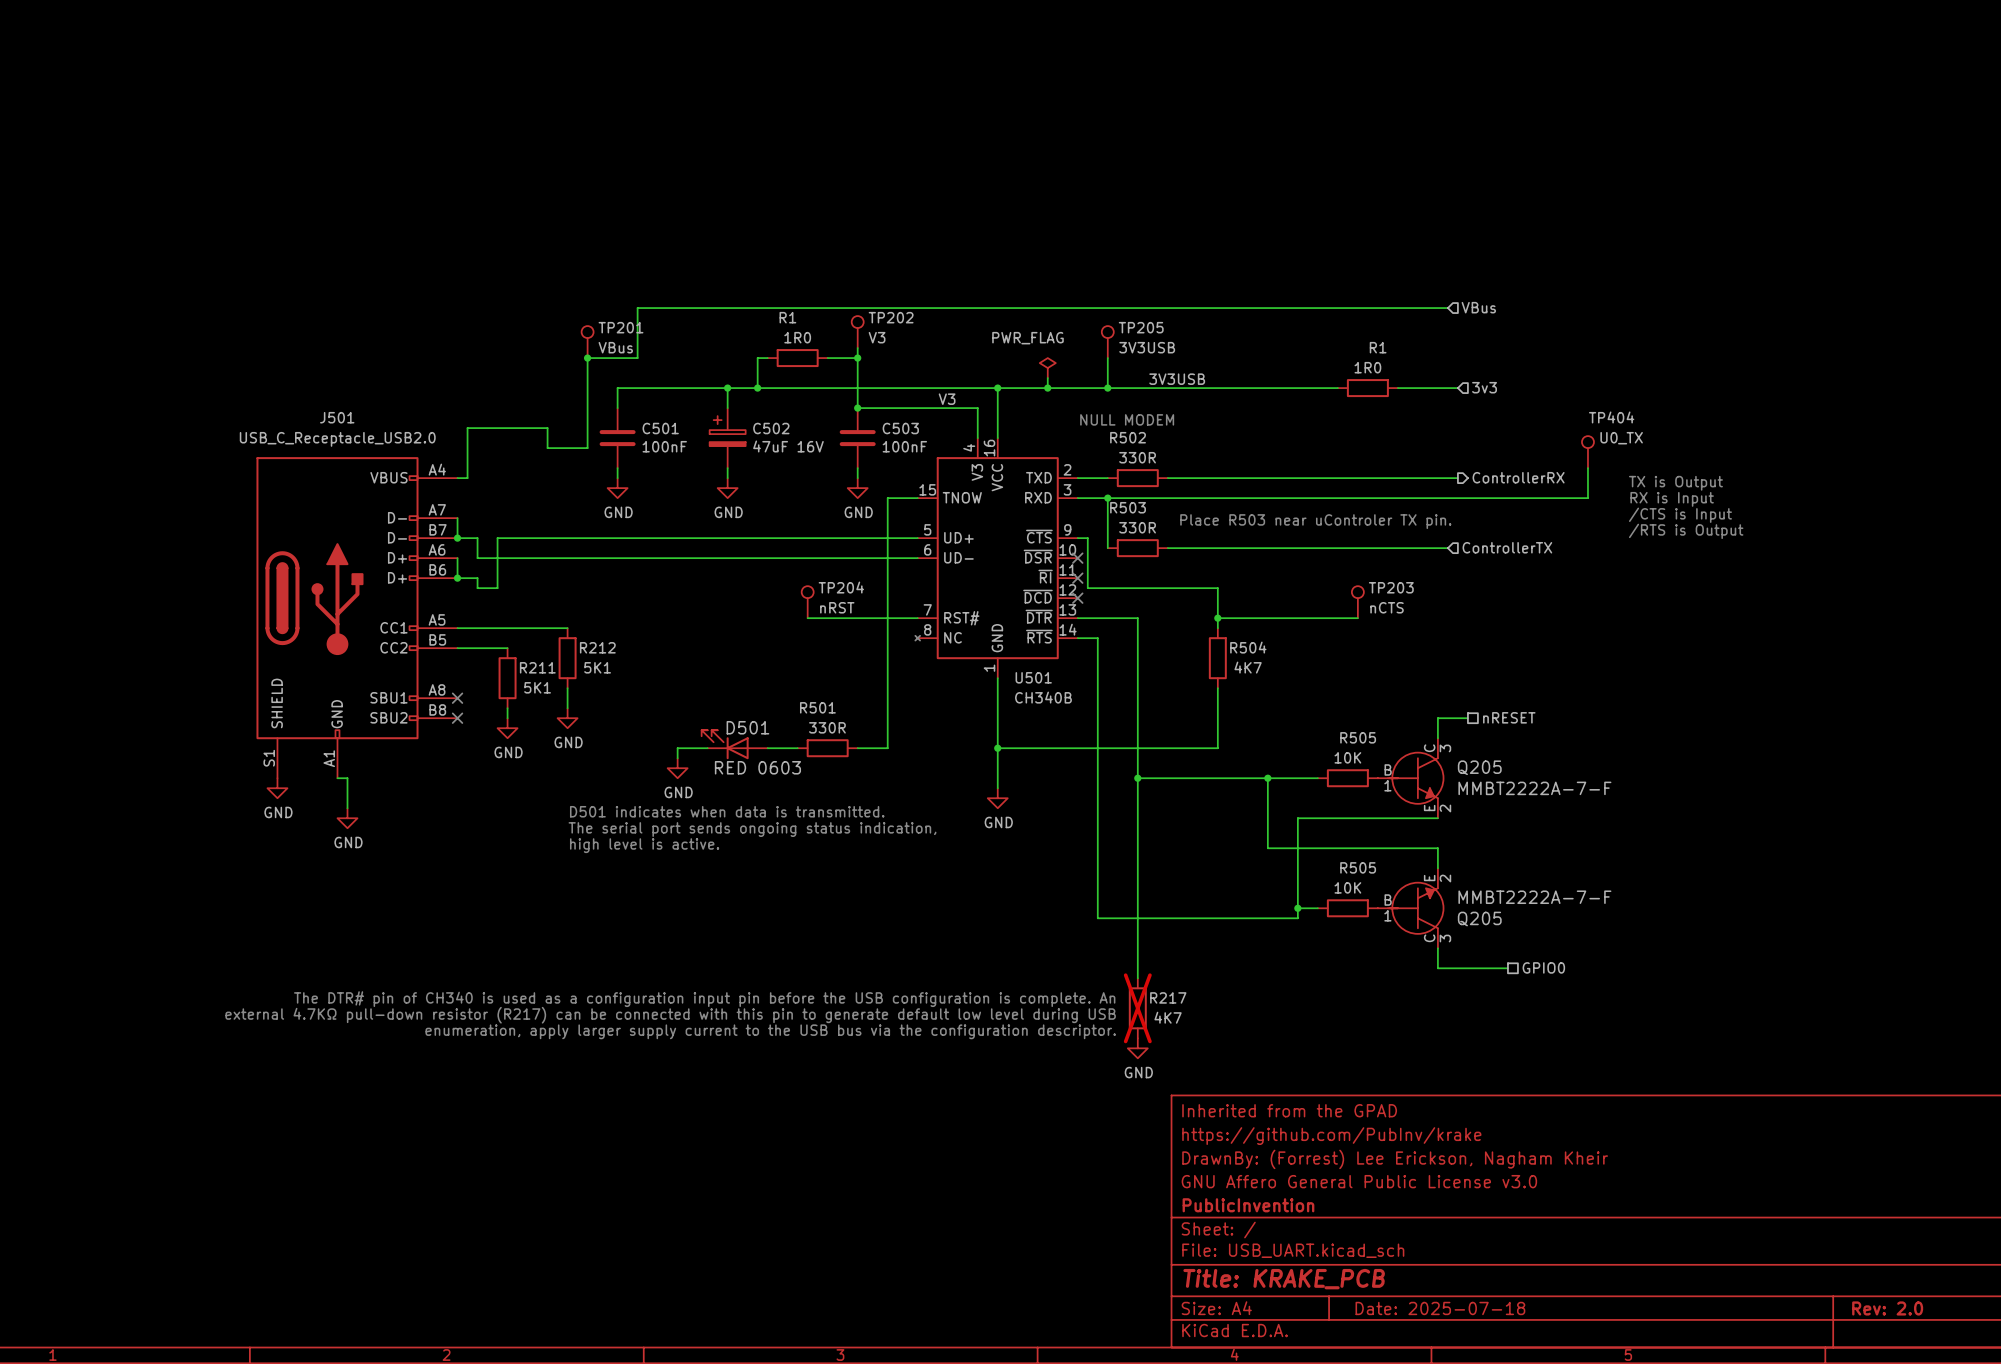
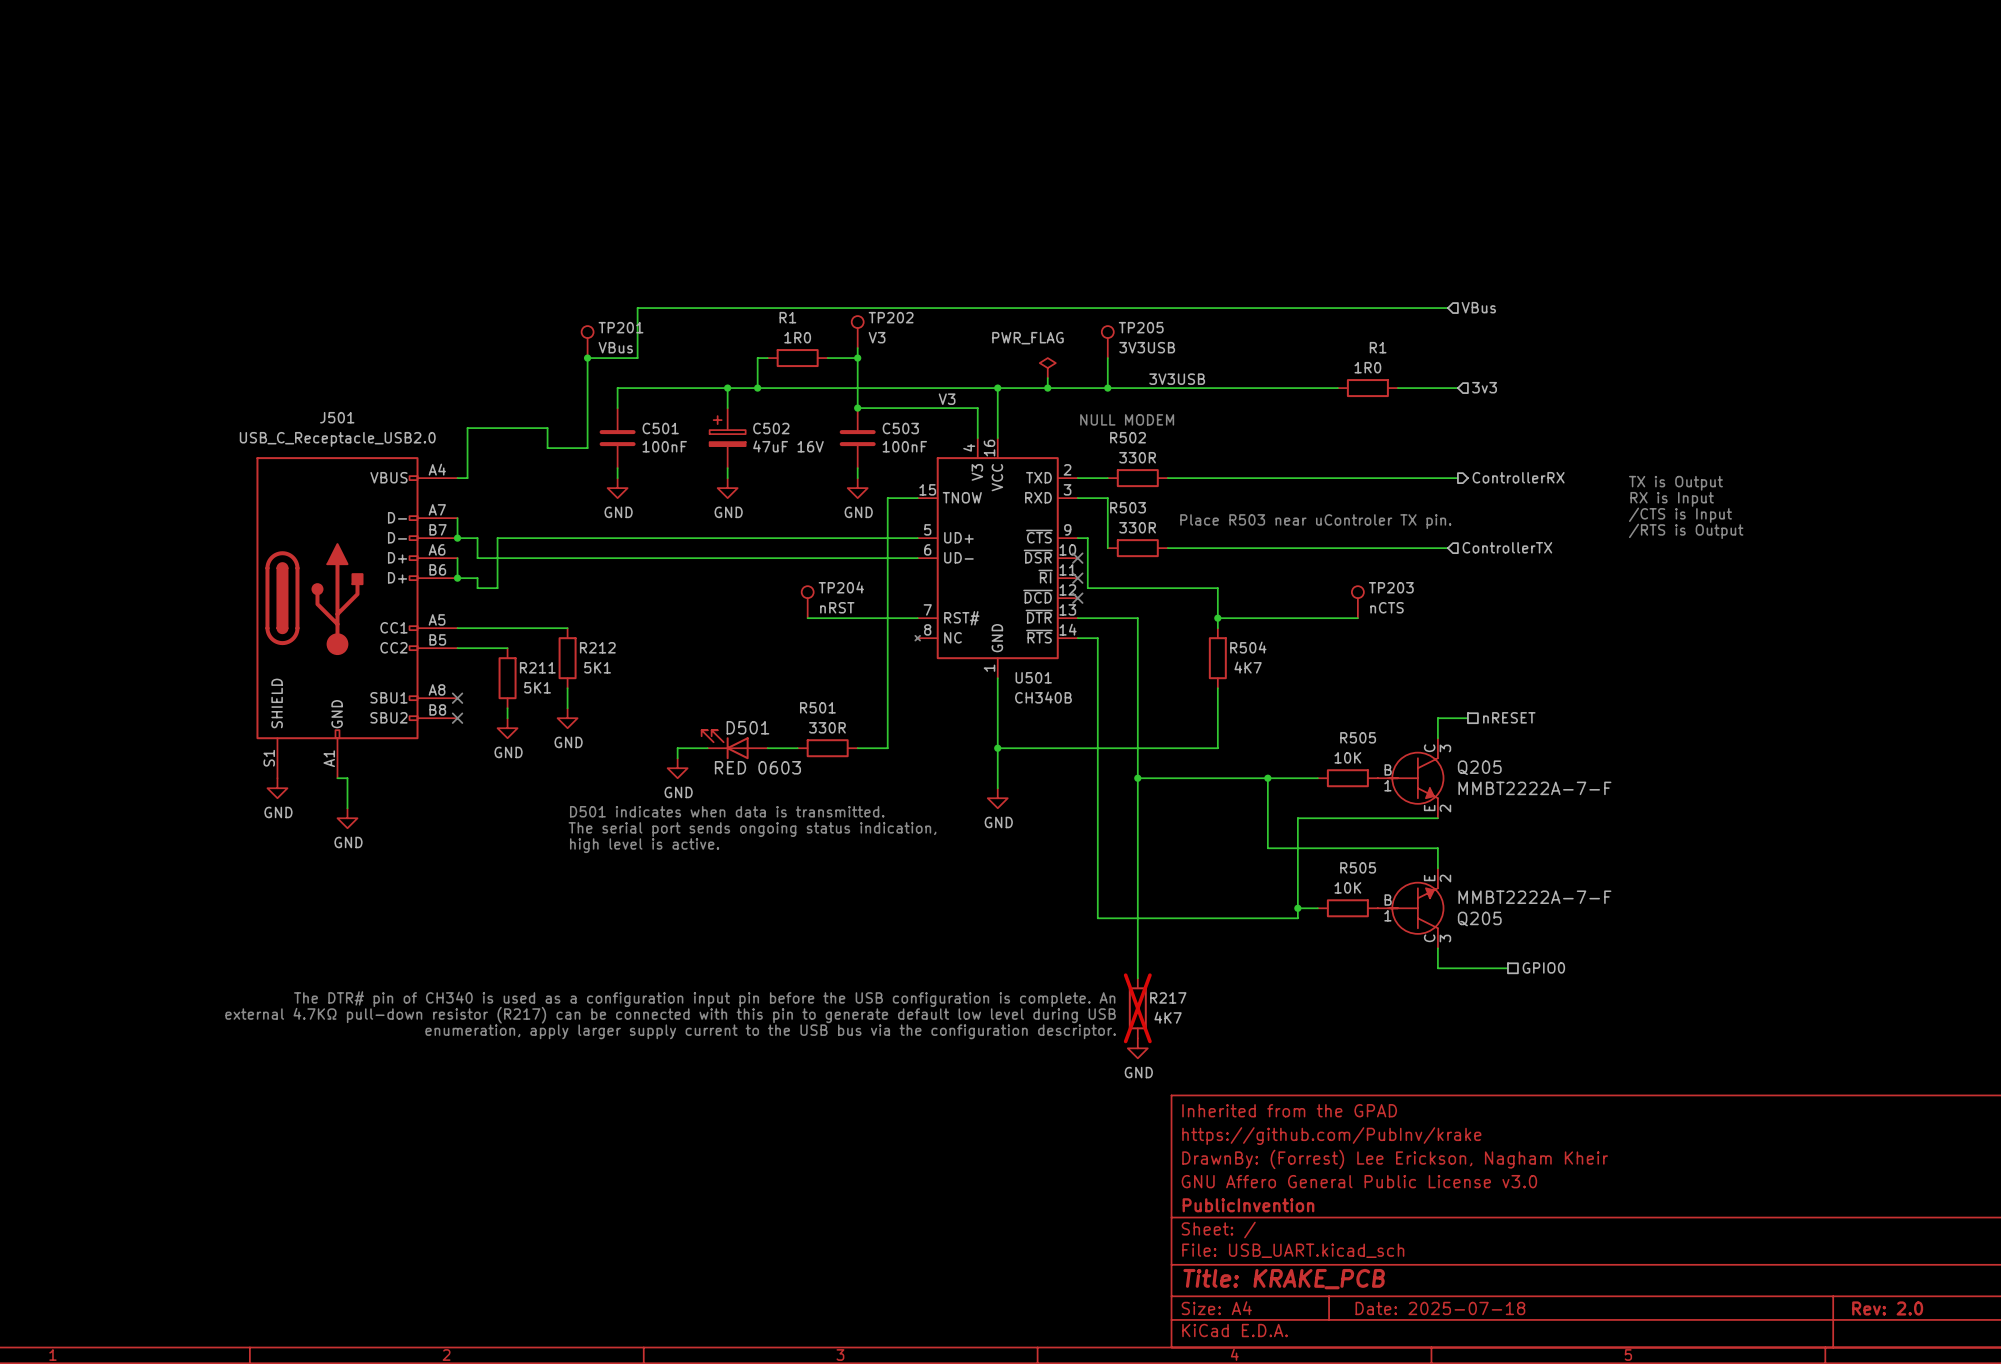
TP404: U0_TX (1587, 452) -> none
wire: (1587, 468) (1587, 498) (1107, 498) -> none
junction: (1107, 498) -> none

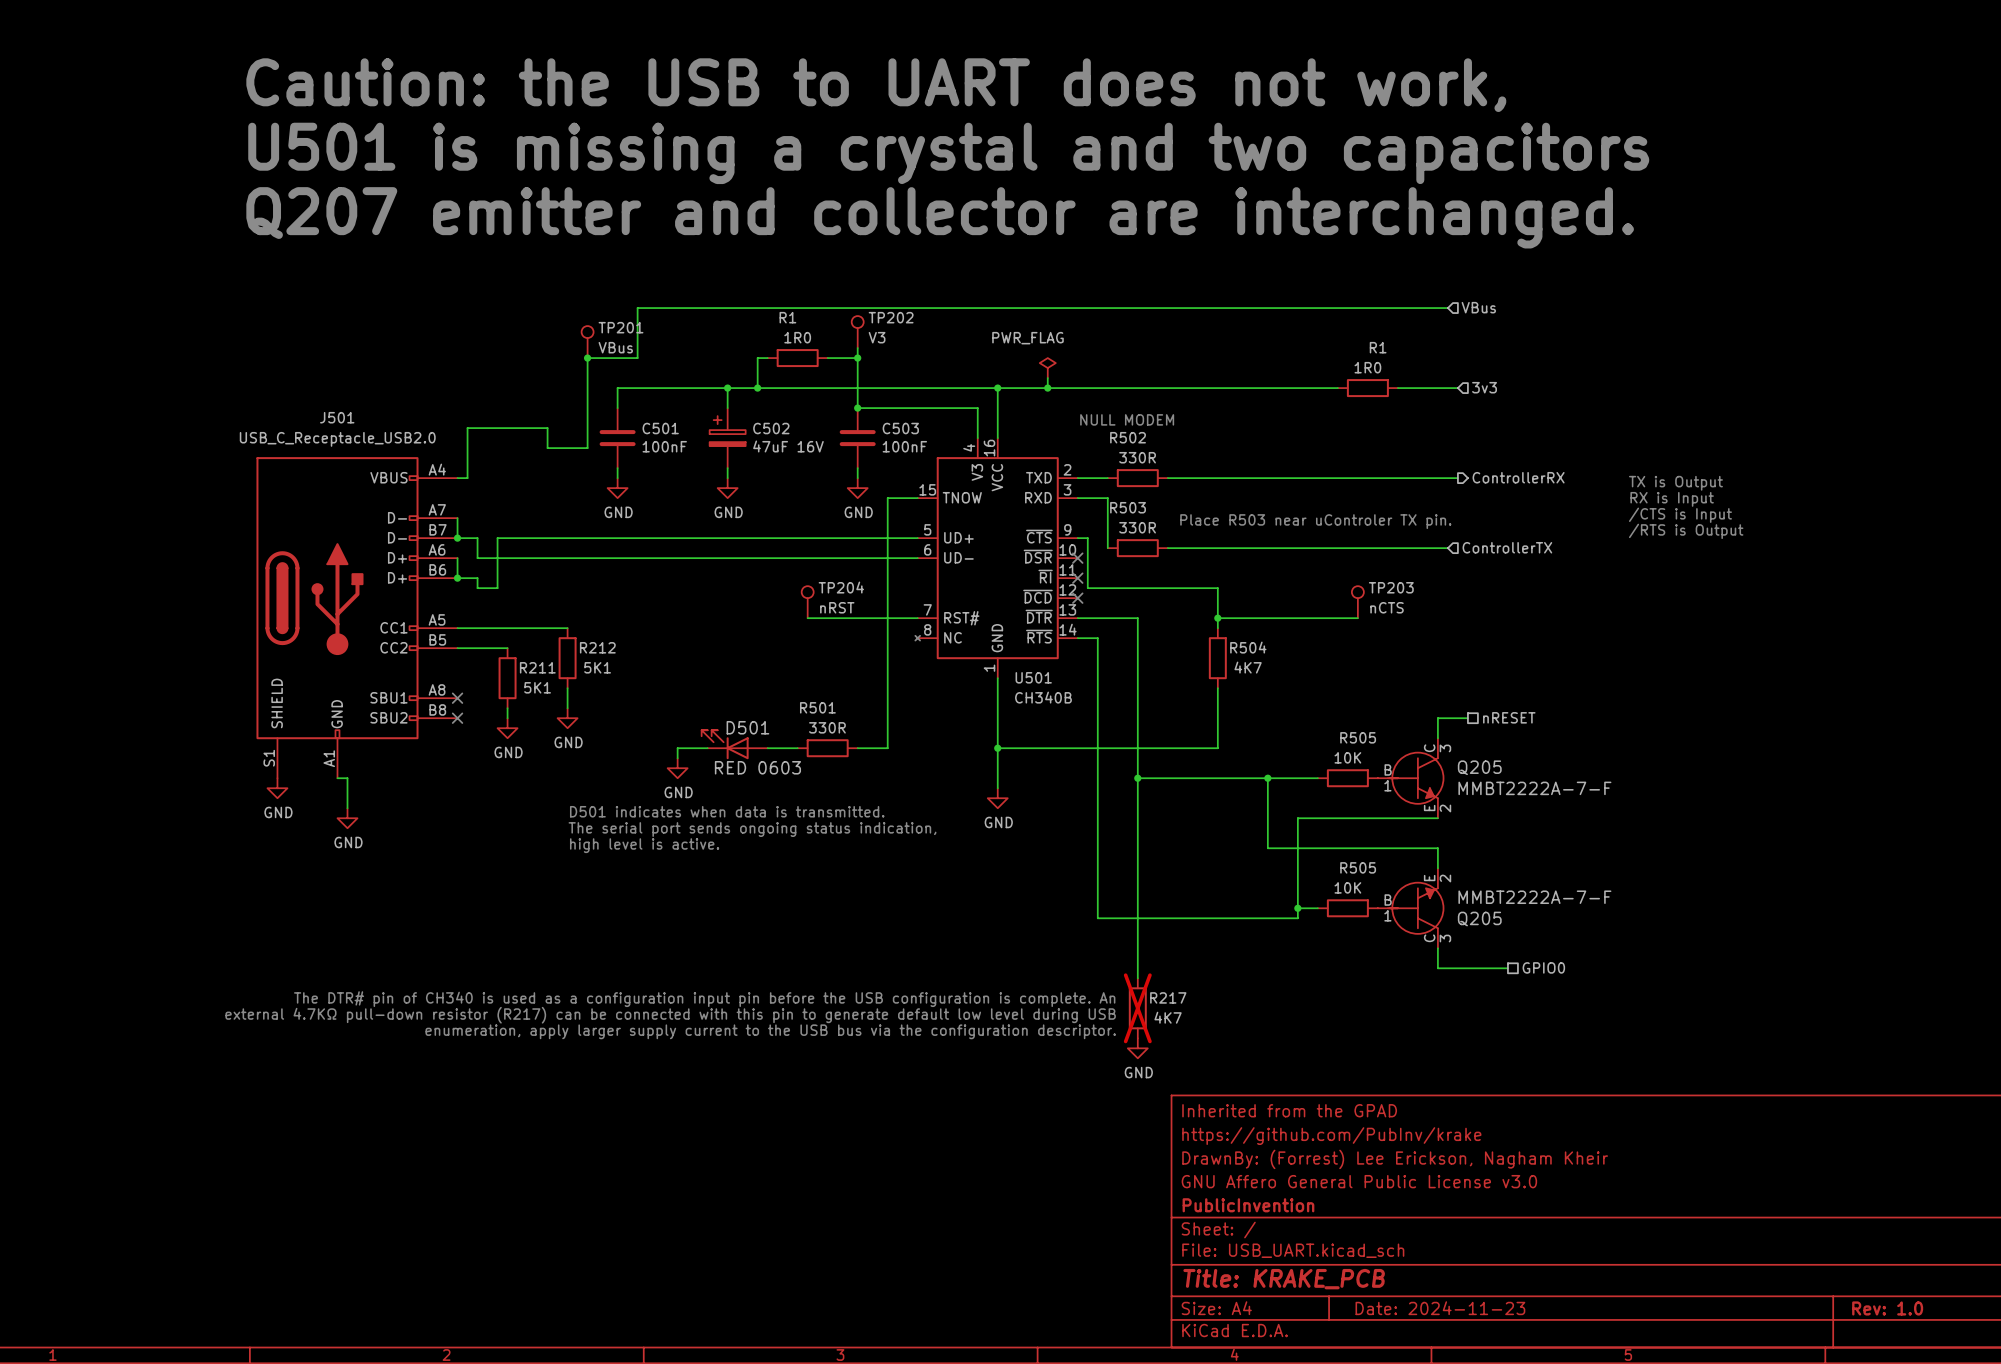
text: none -> Caution: the USB to UART does not work, (876, 85)
text: none -> U501 is missing a crystal and two capacitors (948, 153)
text: none -> Q207 emitter and collector are interchanged. (940, 217)
TP205: 3V3USB (1107, 342) -> none
wire: (1107, 358) (1107, 388) -> none
label: 3V3USB (1177, 379) -> none
junction: (1107, 388) -> none
label: V3 (947, 399) -> none
title block: Date: 2025-07-18 (1440, 1308) -> Date: 2024-11-23 (1440, 1308)
title block: Rev: 2.0 (1887, 1308) -> Rev: 1.0 (1887, 1308)

